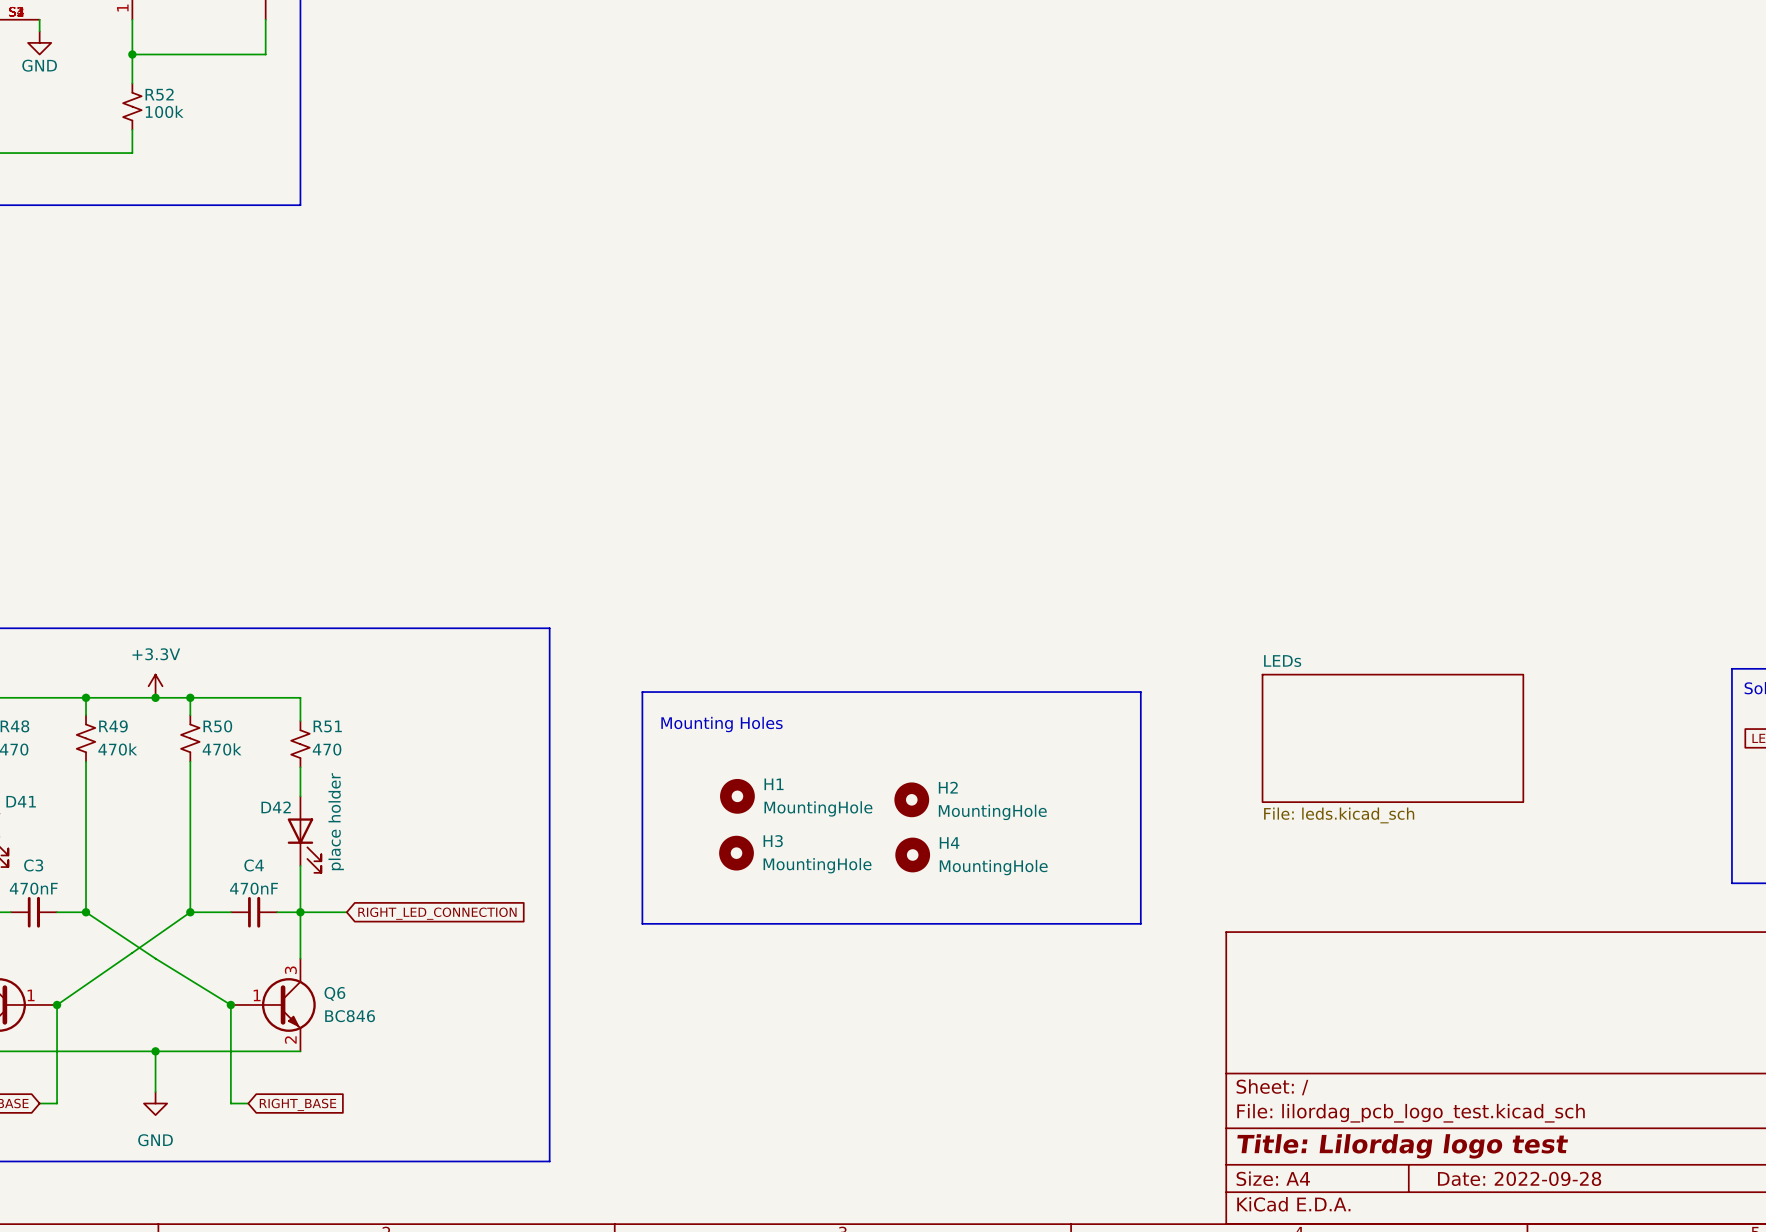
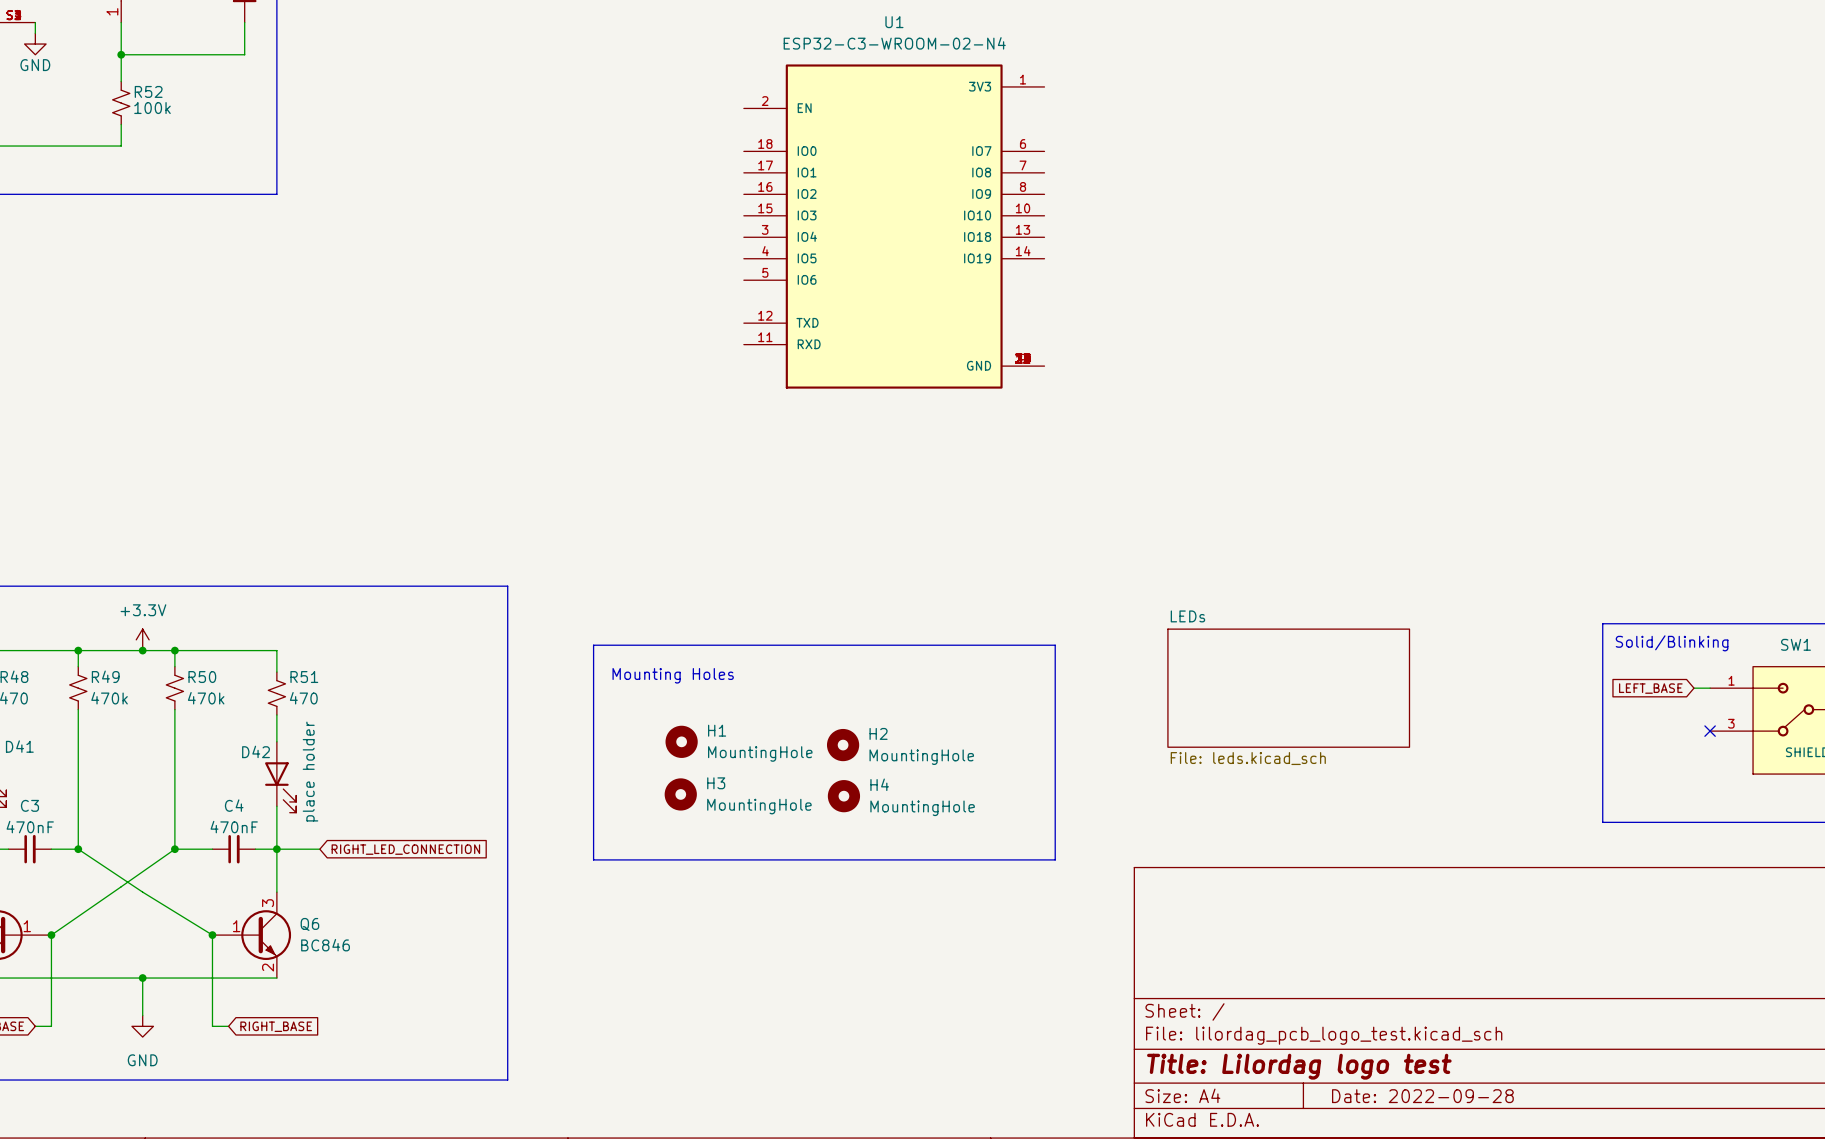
U1: none -> ESP32-C3-WROOM-02-N4 (894, 226)

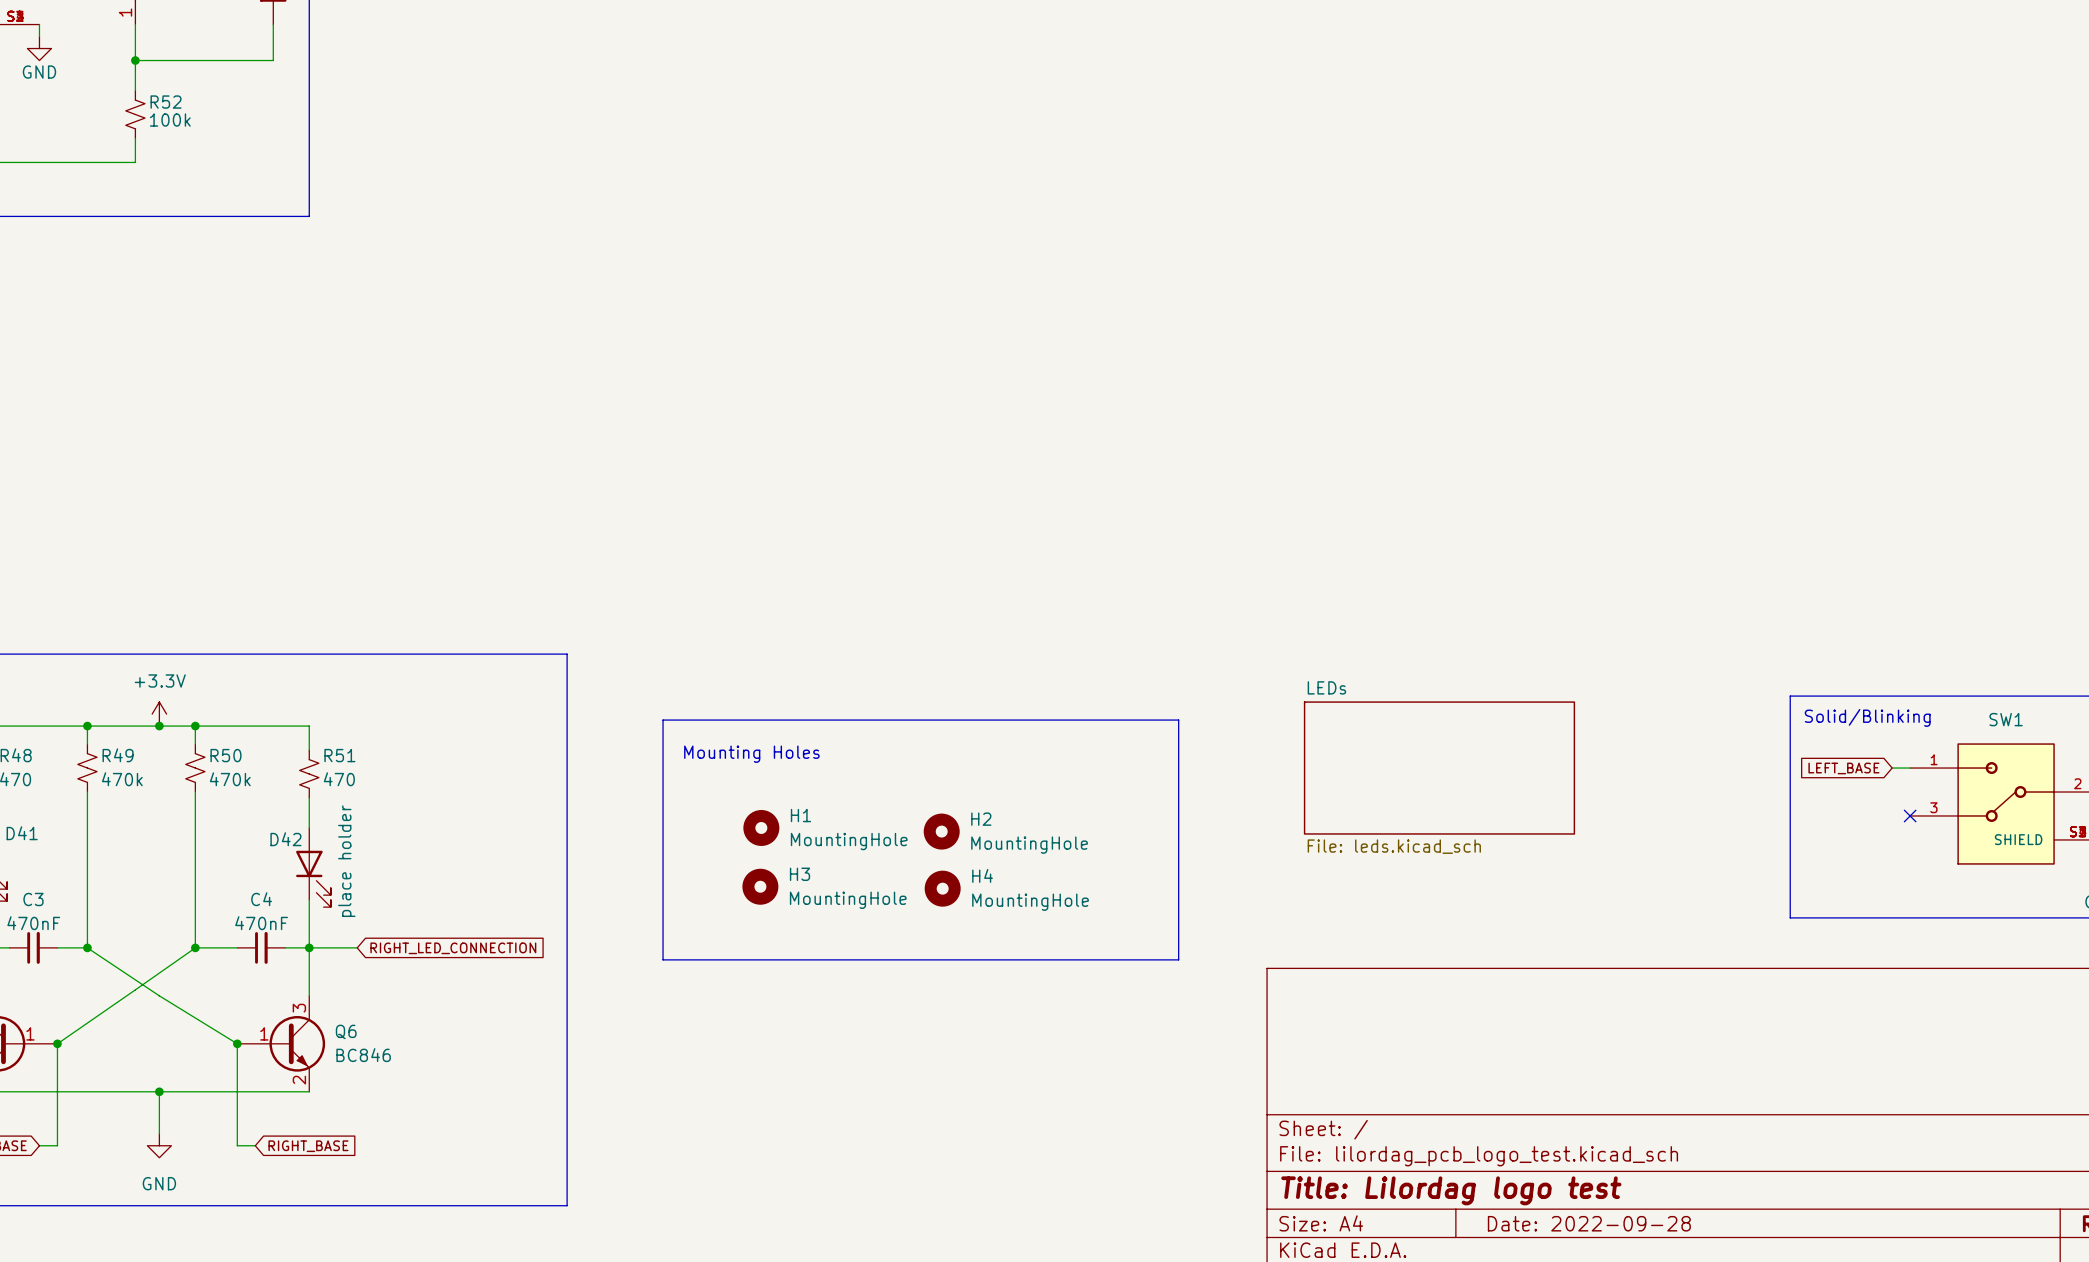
U1: ESP32-C3-WROOM-02-N4 (894, 226) -> none

